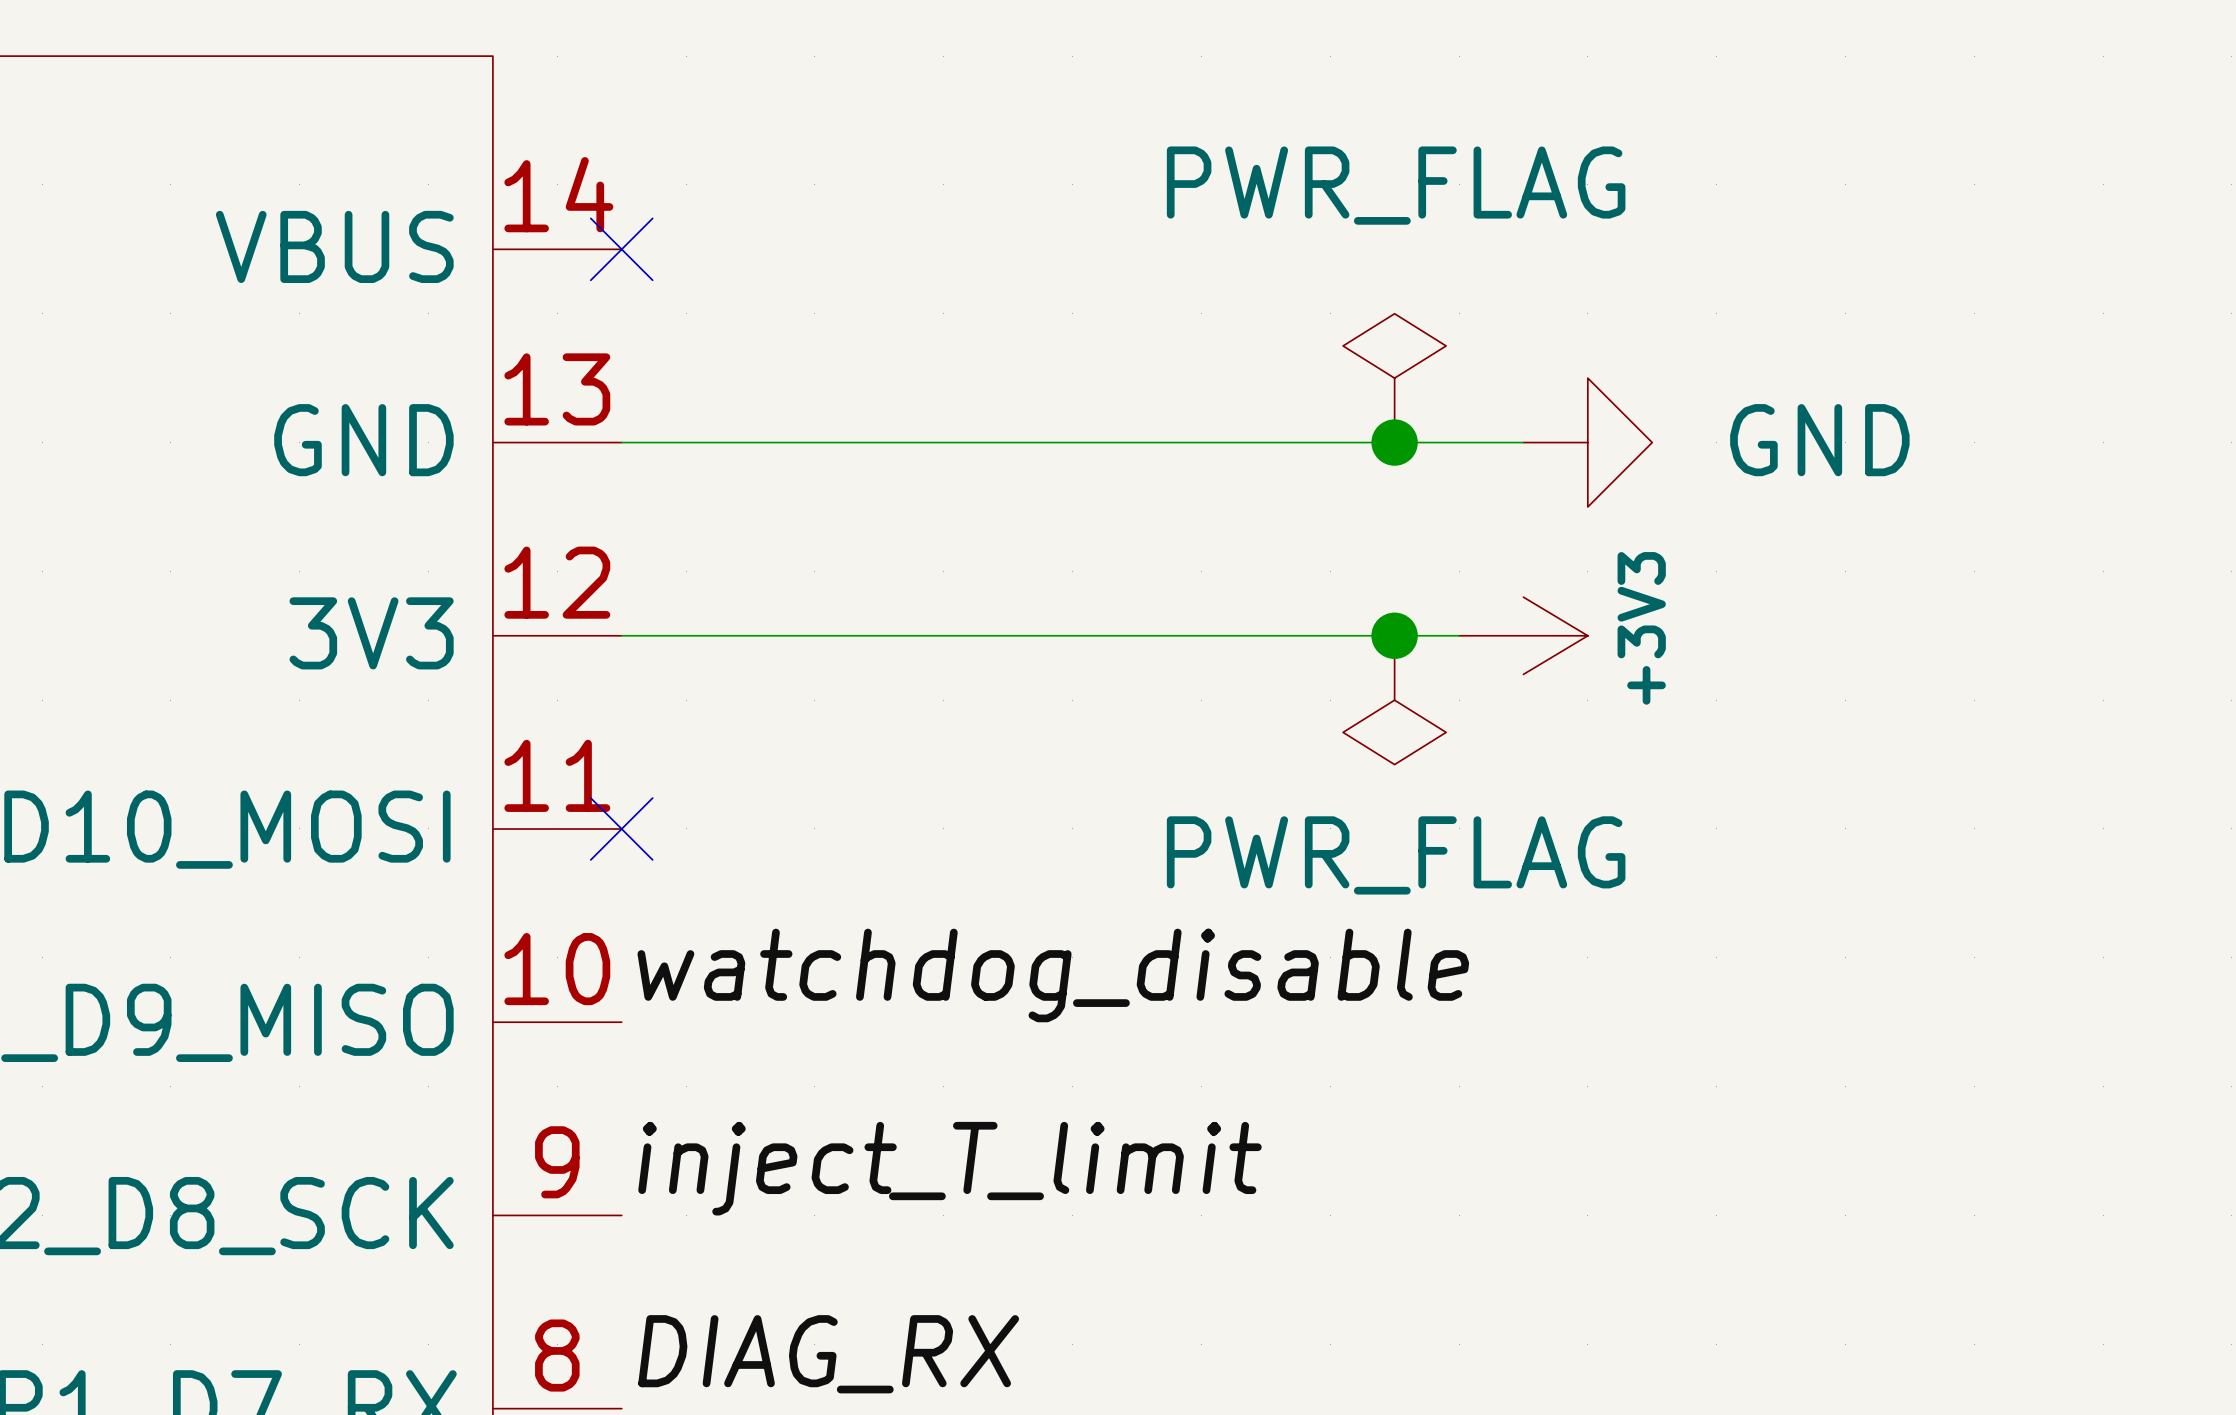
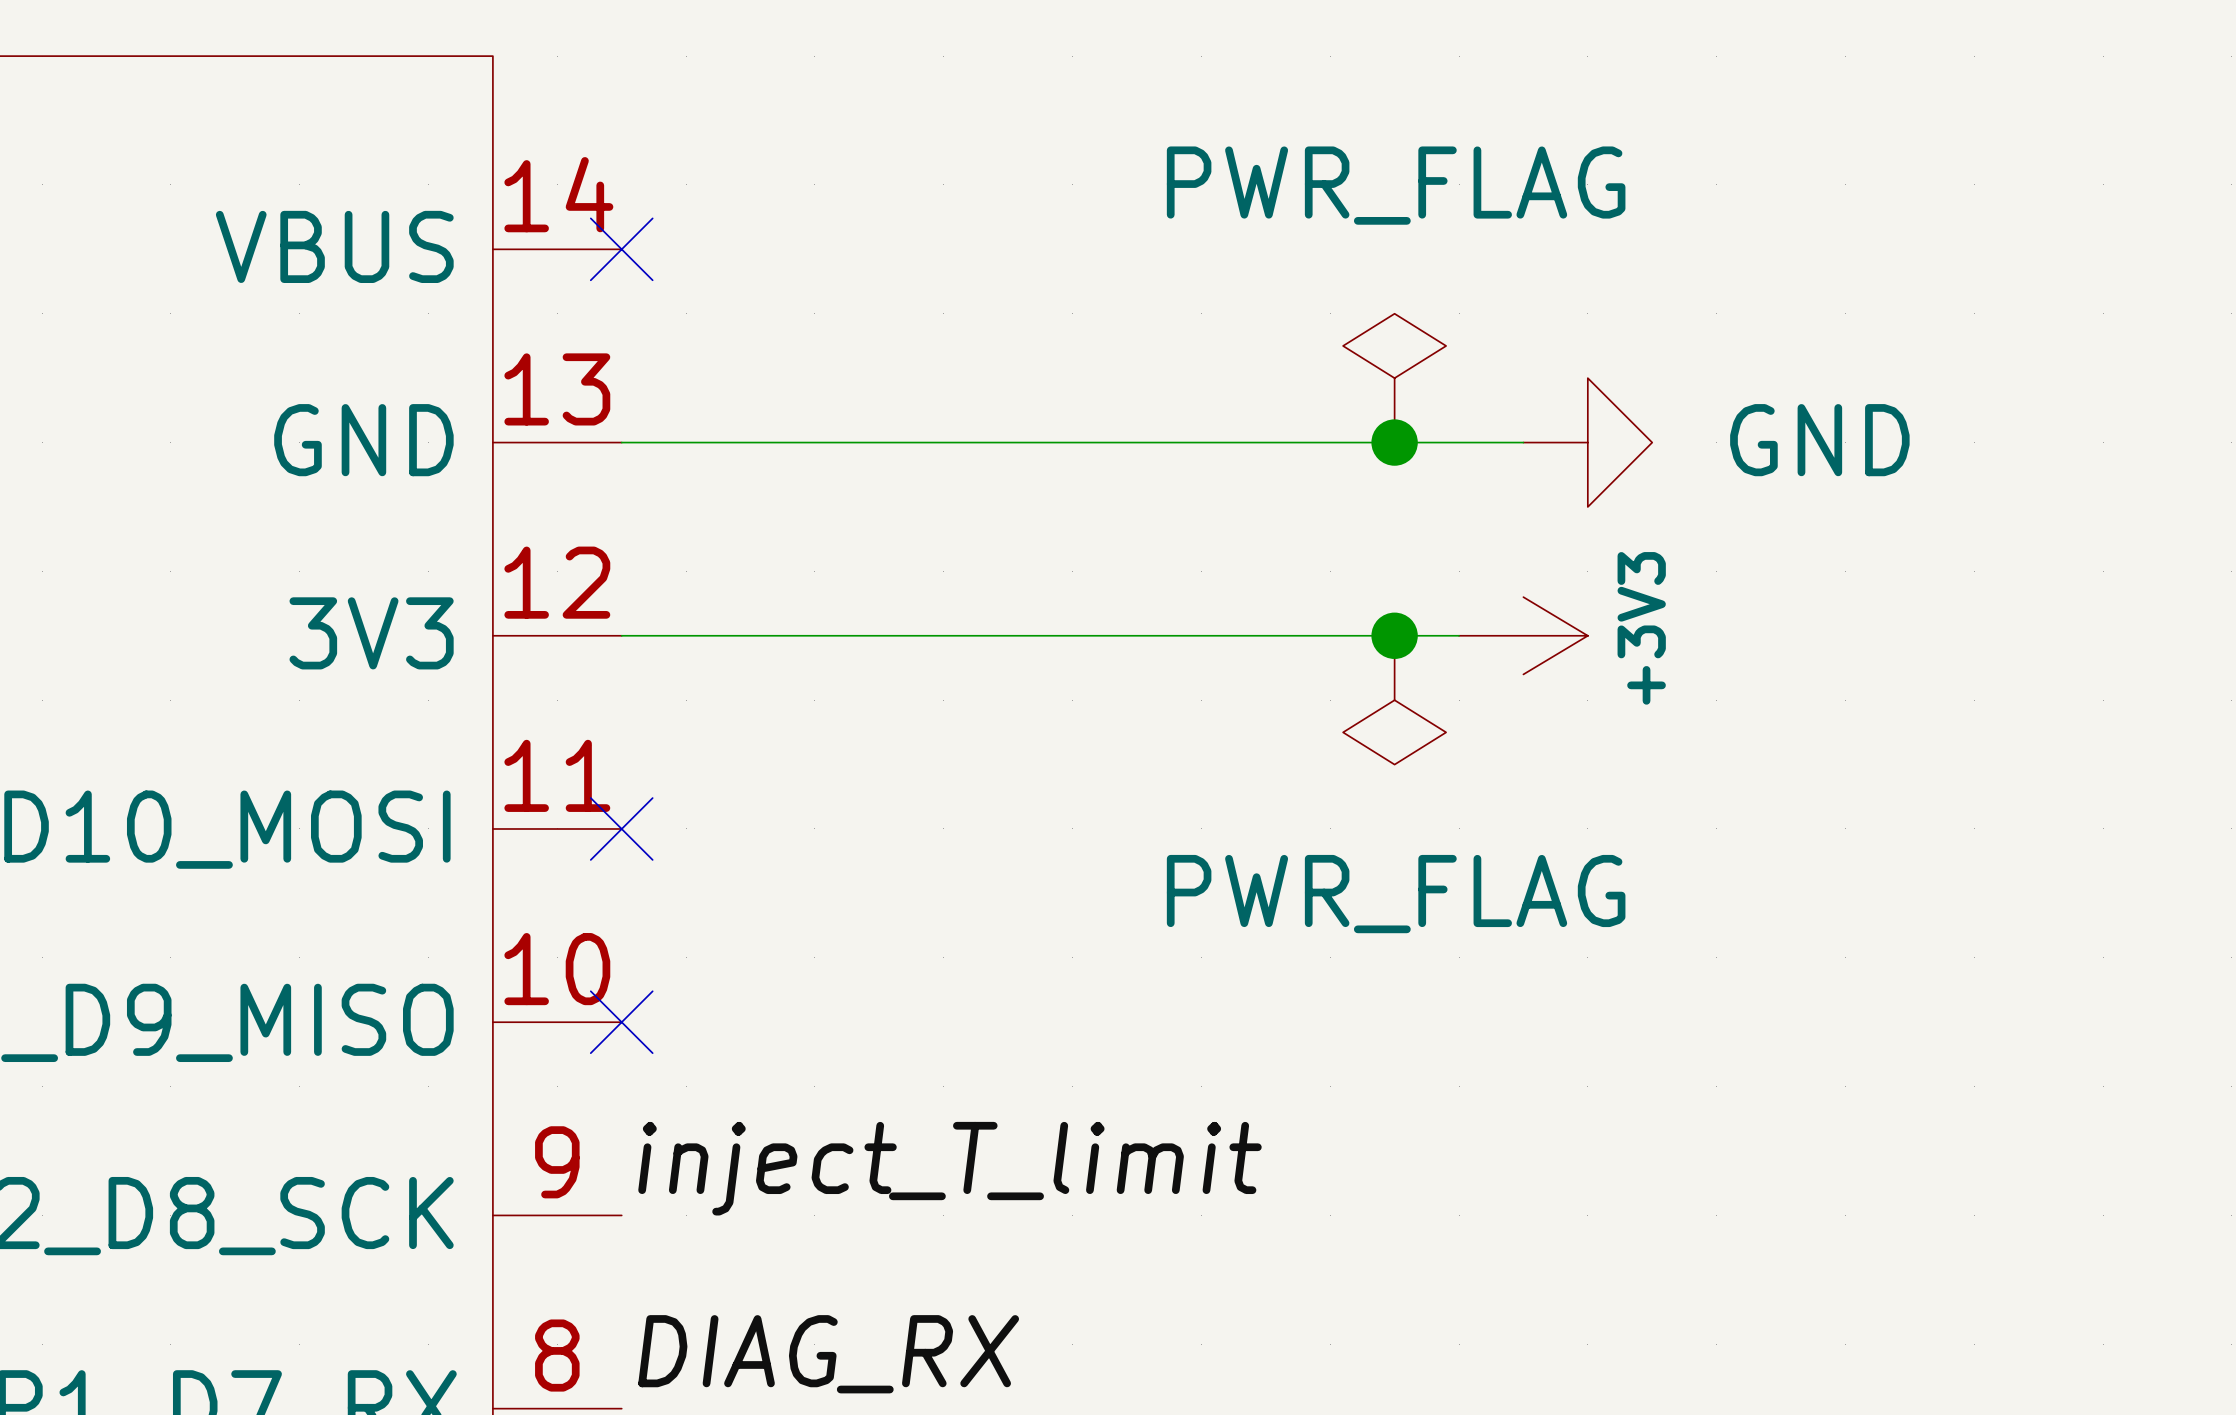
power symbol text position: PWR_FLAG (1396, 855) -> PWR_FLAG (1396, 894)
label: watchdog_disable (1053, 975) -> none
no-connect mark: none -> (621, 1022)

